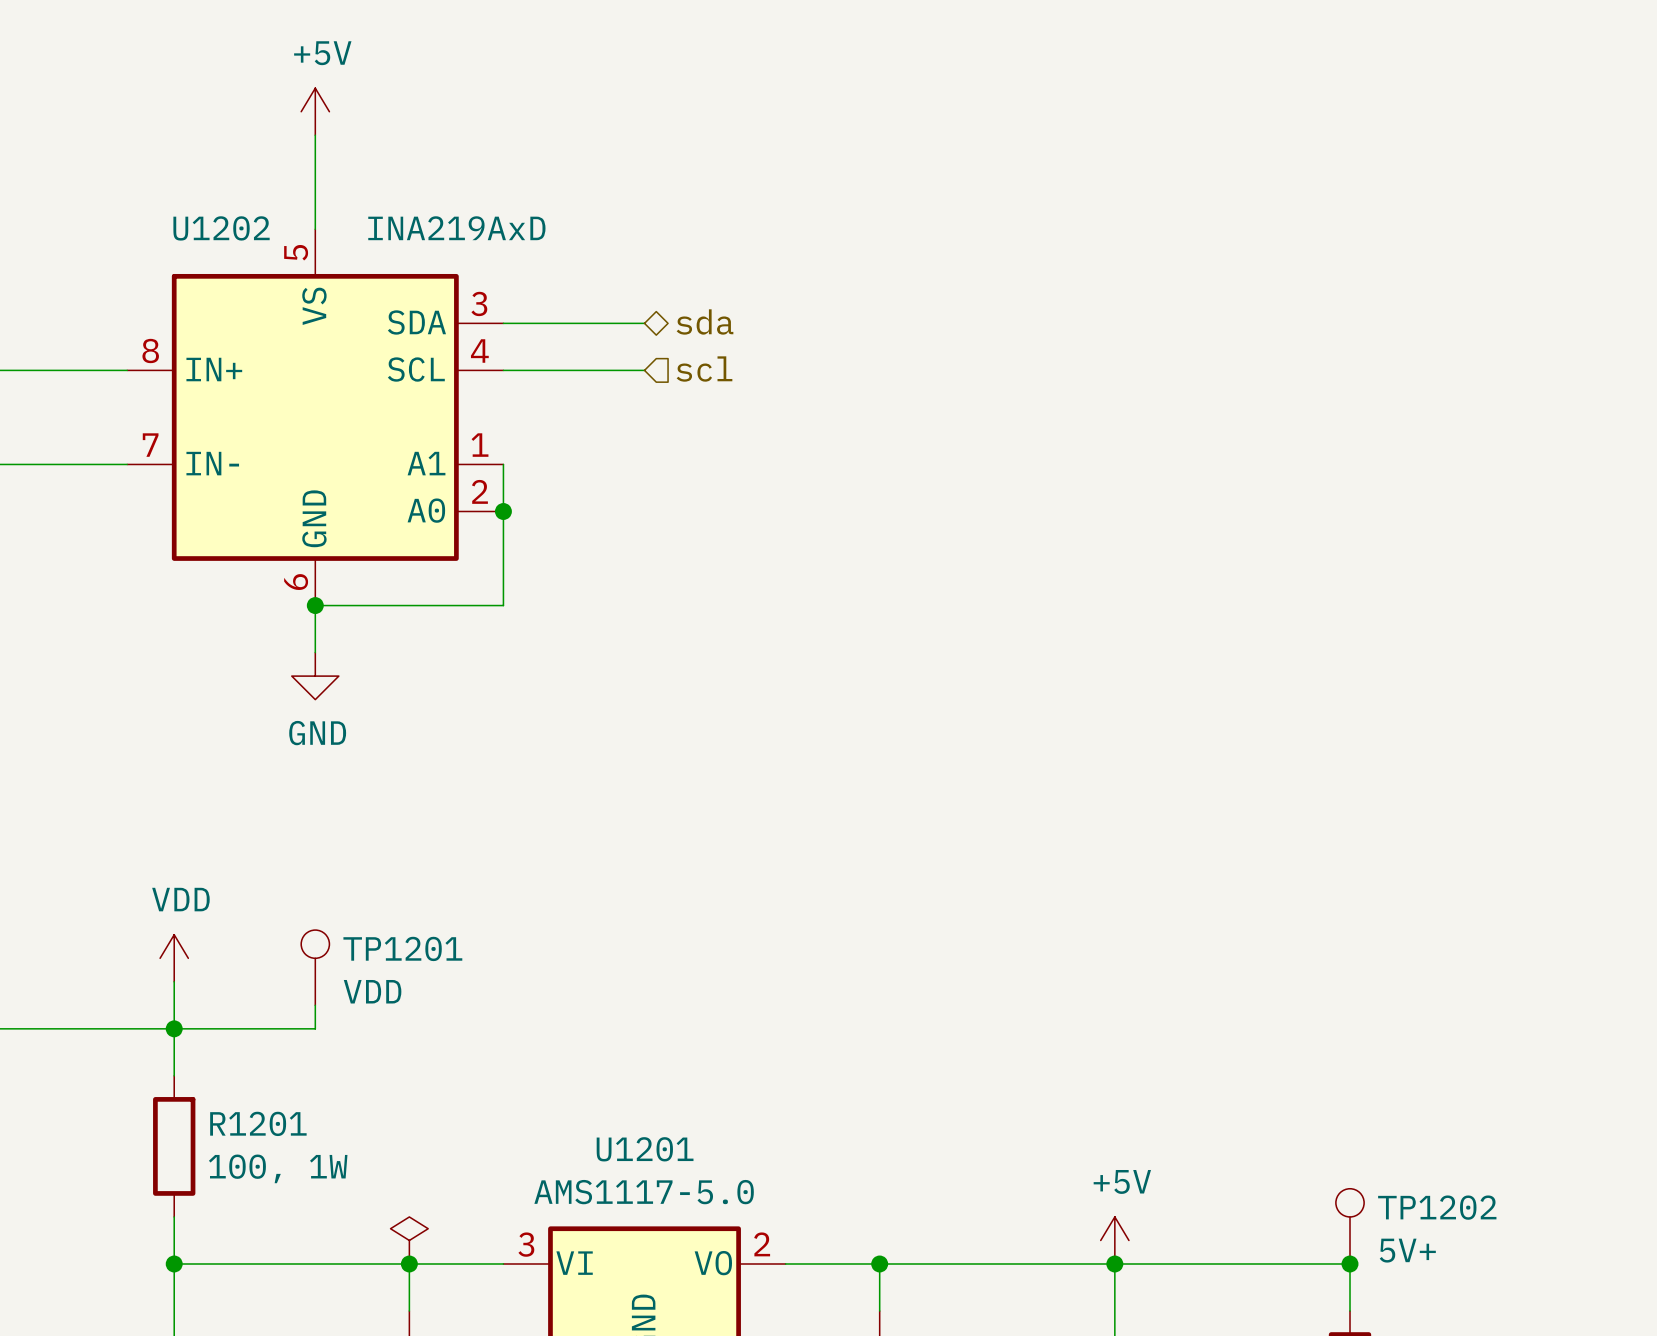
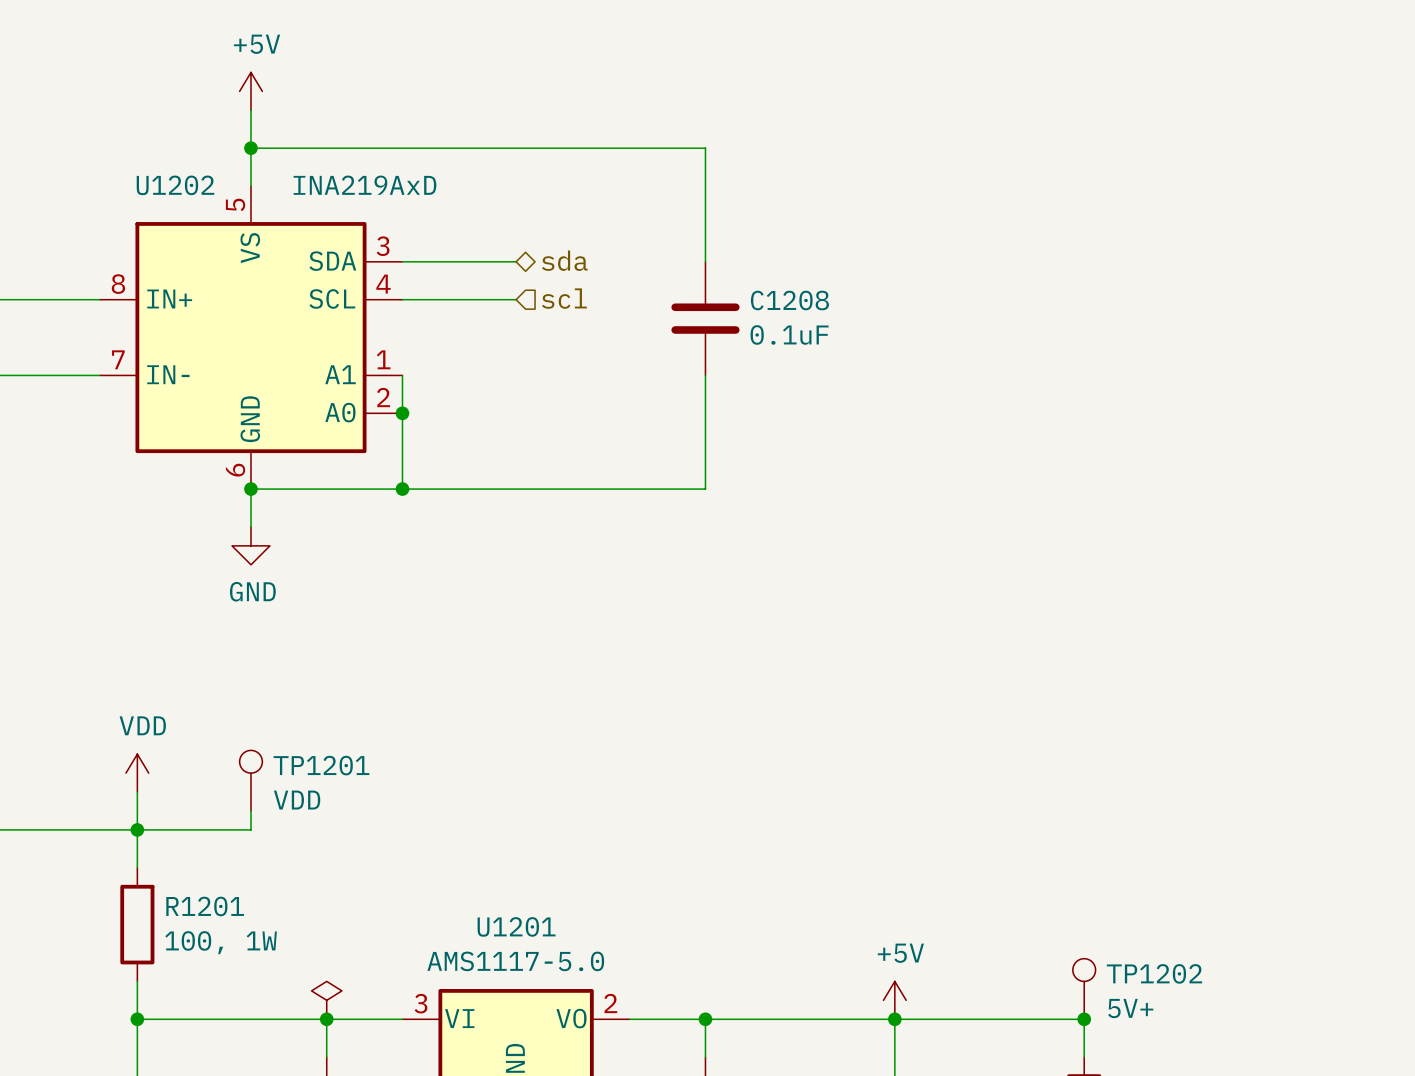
wire: none -> (250, 148) (705, 148) (705, 261)
junction: none -> (250, 148)
C1208: none -> 0.1uF (705, 318)
wire: none -> (705, 375) (705, 489) (402, 489)
junction: none -> (402, 489)

